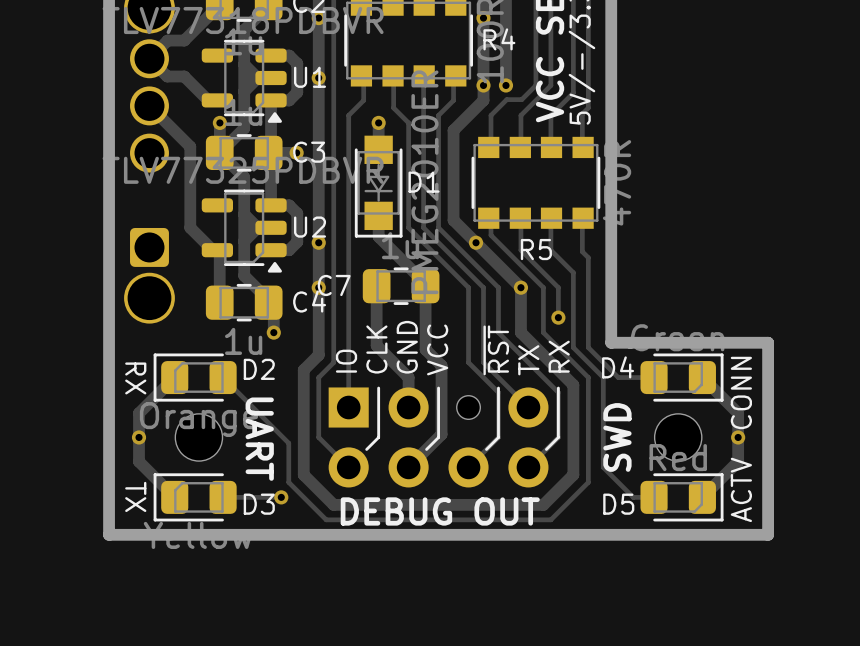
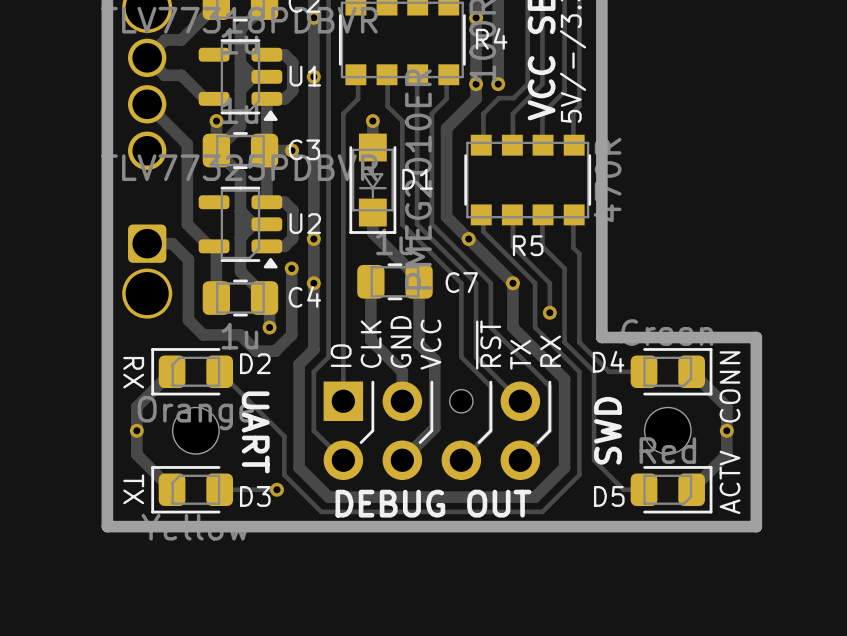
track: none -> (147, 243) (172, 243) (188, 259) (188, 320) (203, 334) (240, 334) (256, 351) (275, 351) (291, 334) (291, 268)
via: none -> (291, 268)
C7 name position: C7 (334, 285) -> C7 (461, 282)

